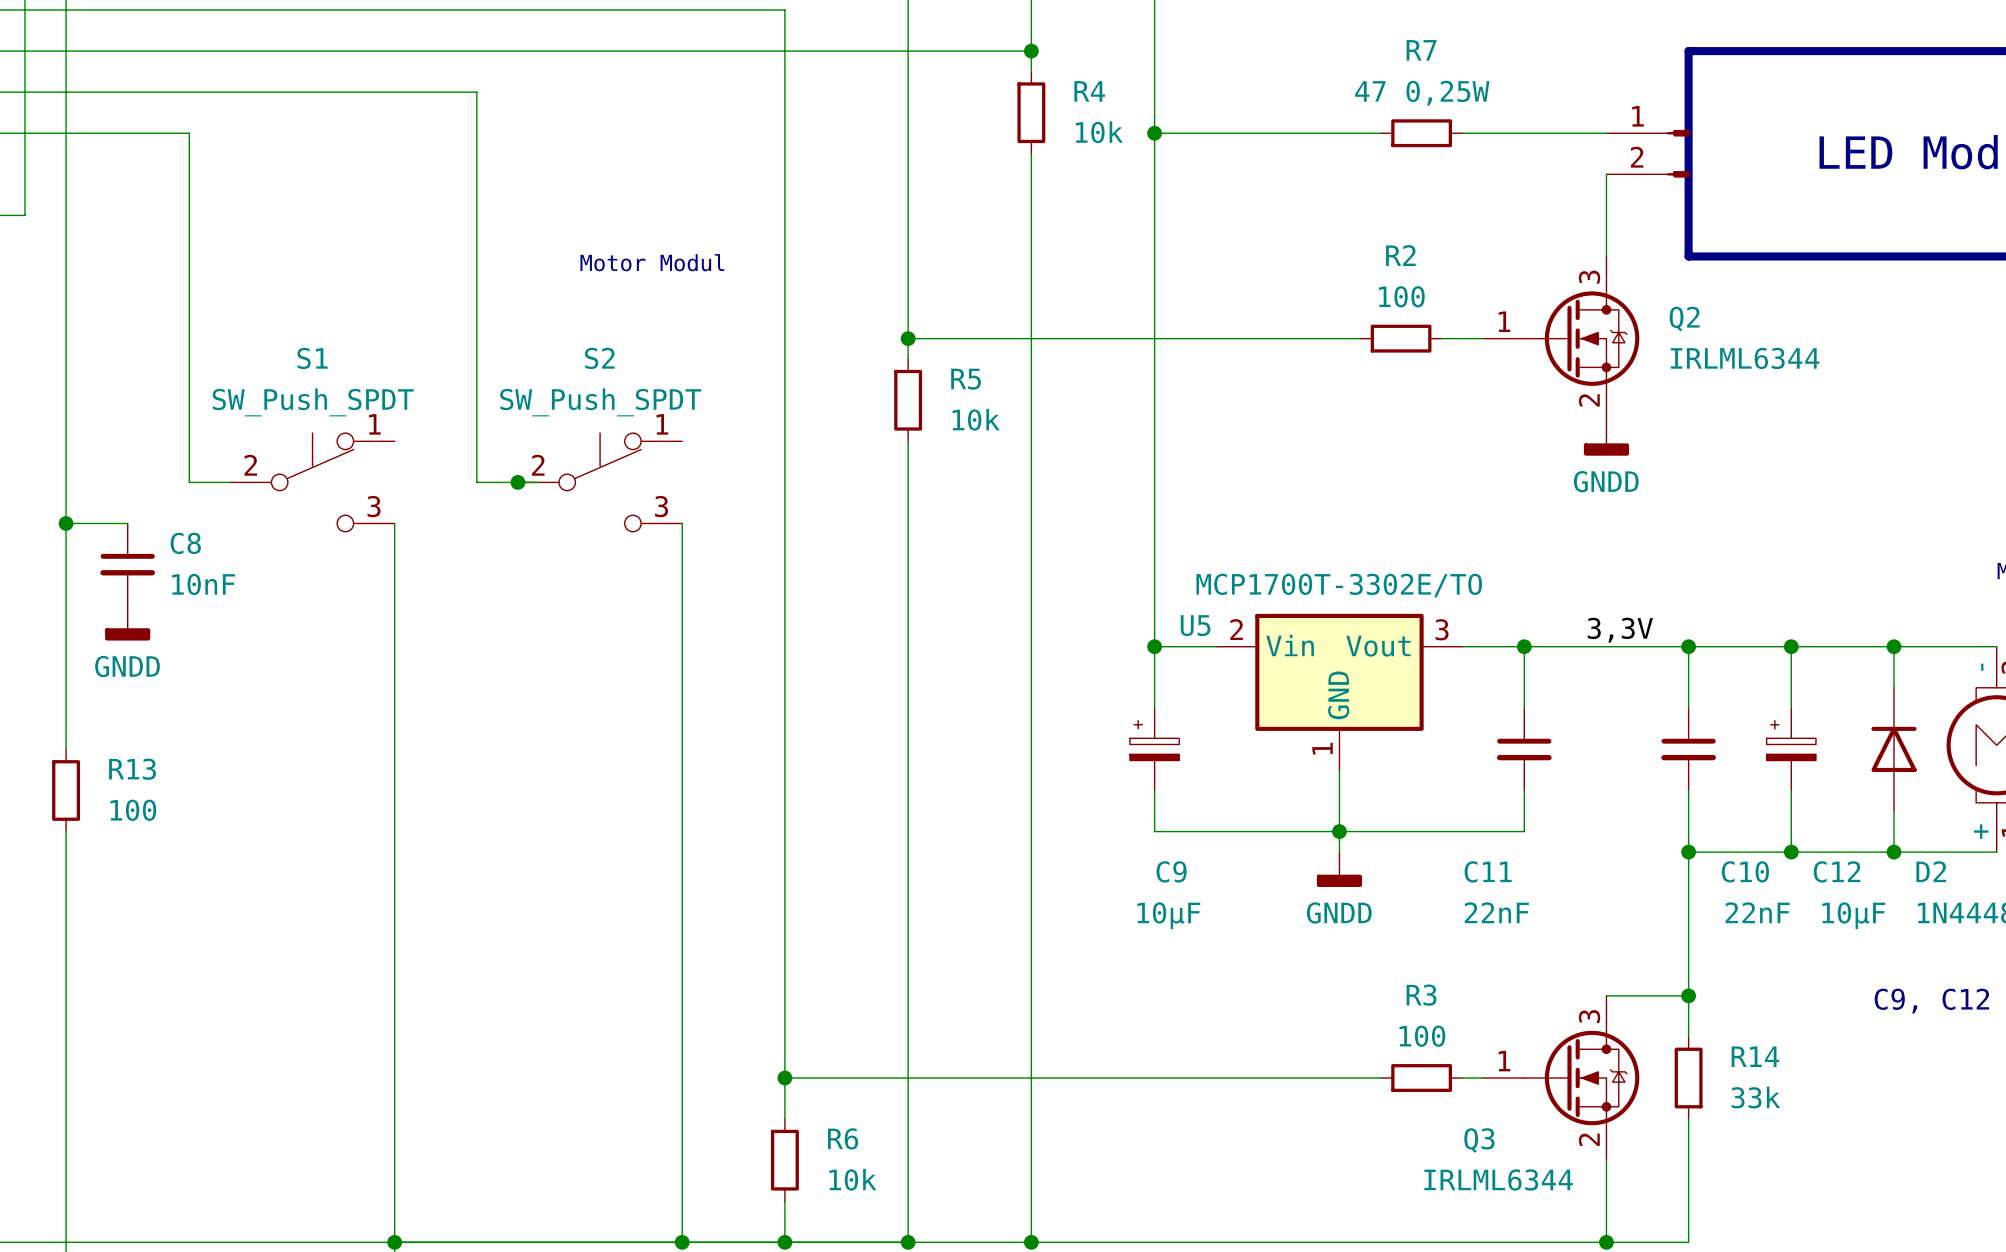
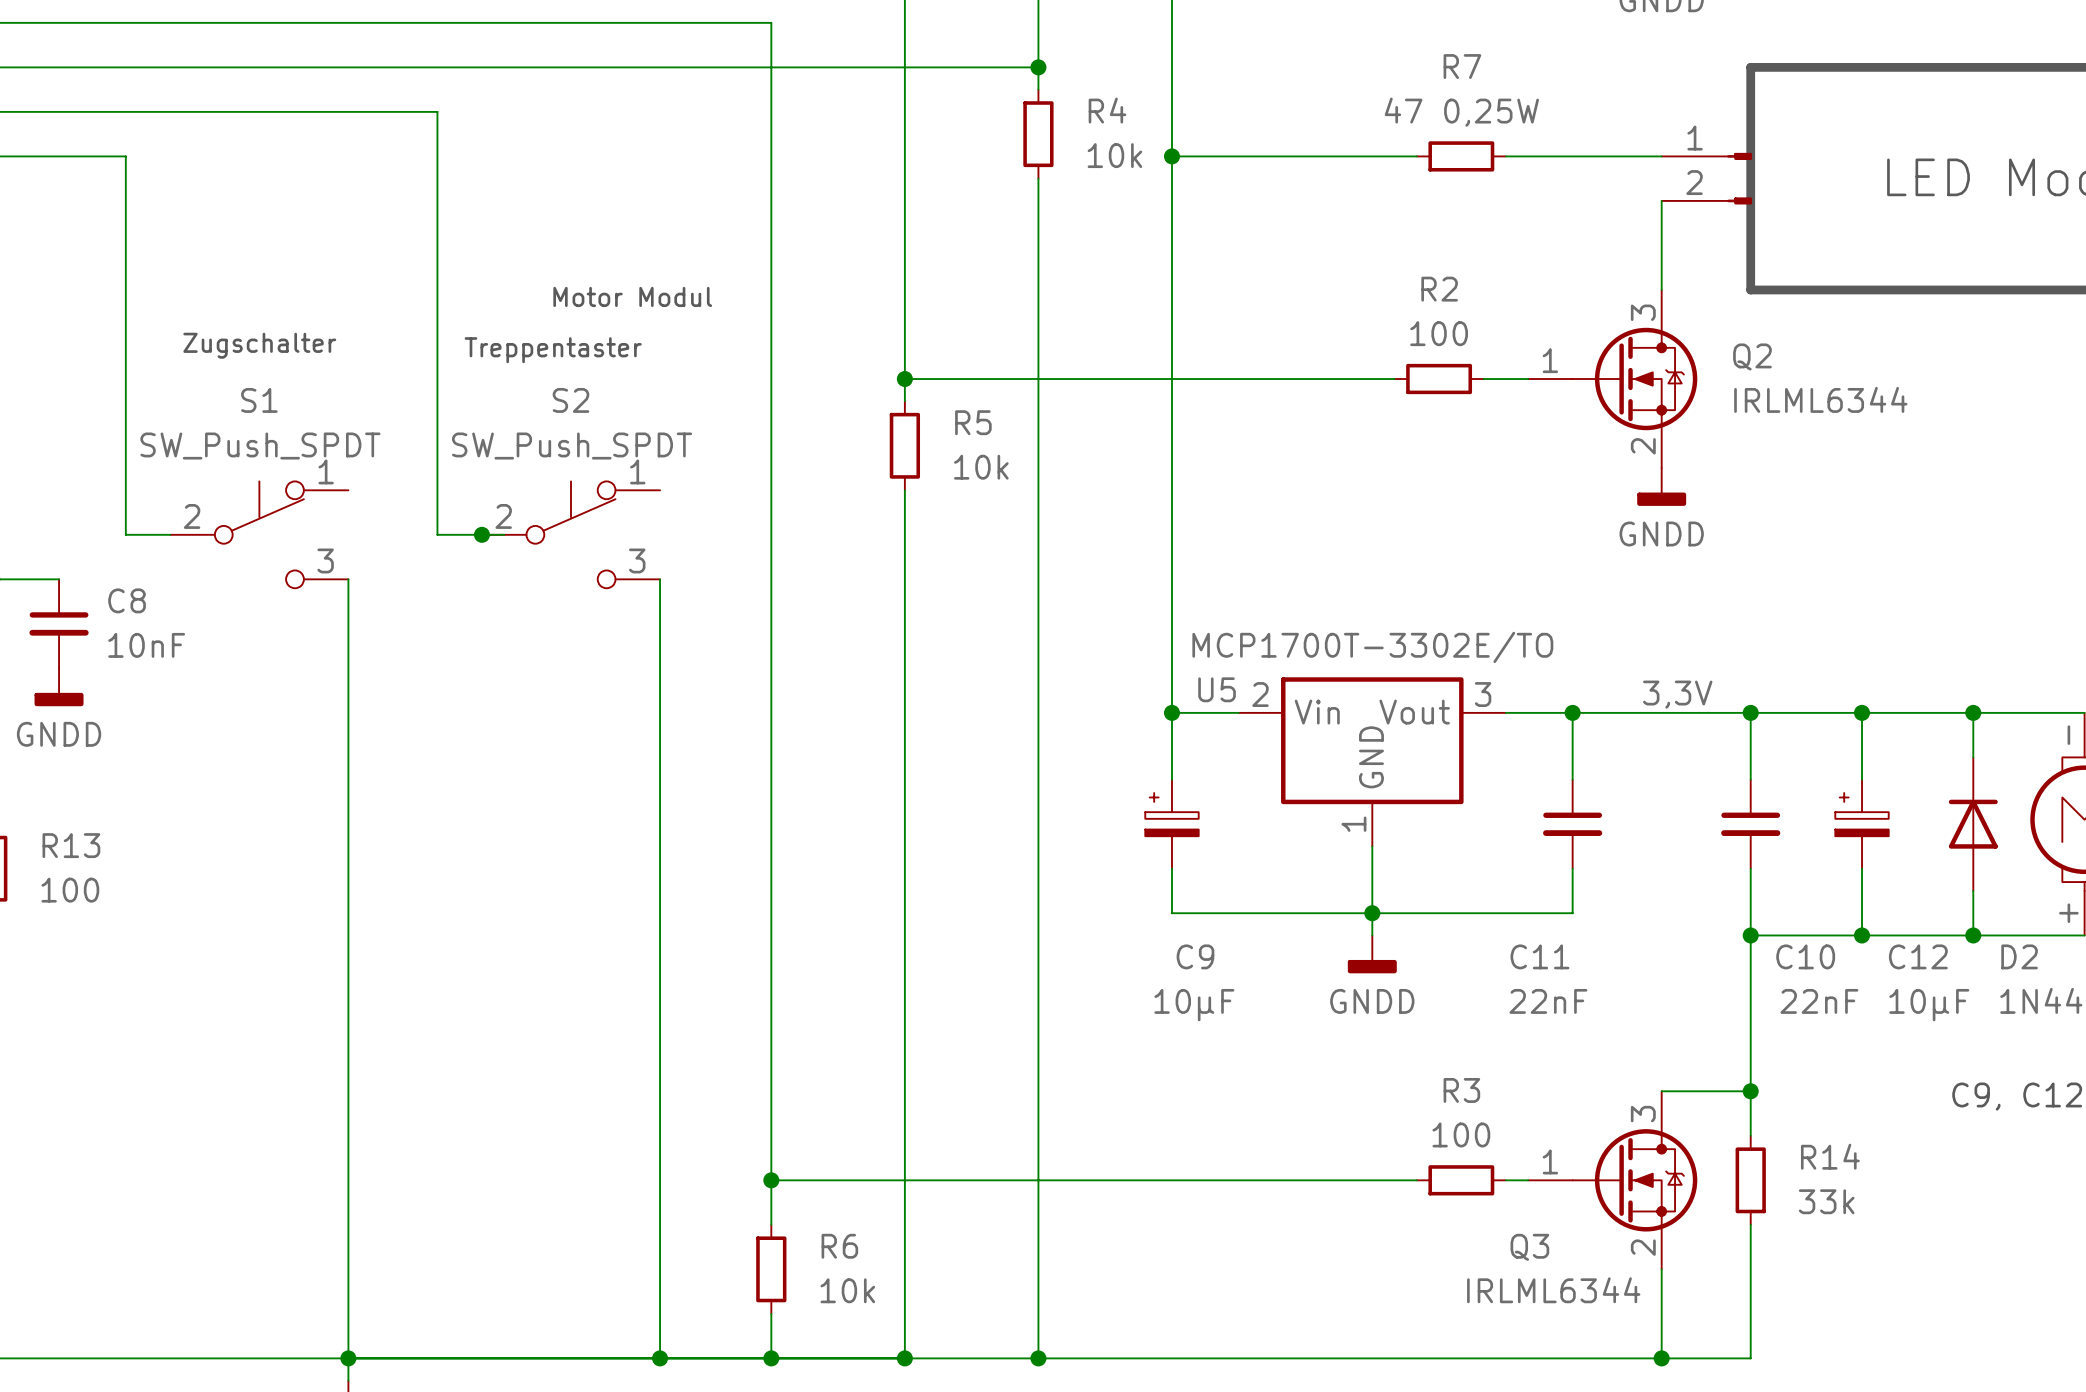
text: none -> Zugschalter (259, 345)
text: none -> Treppentaster (553, 350)

